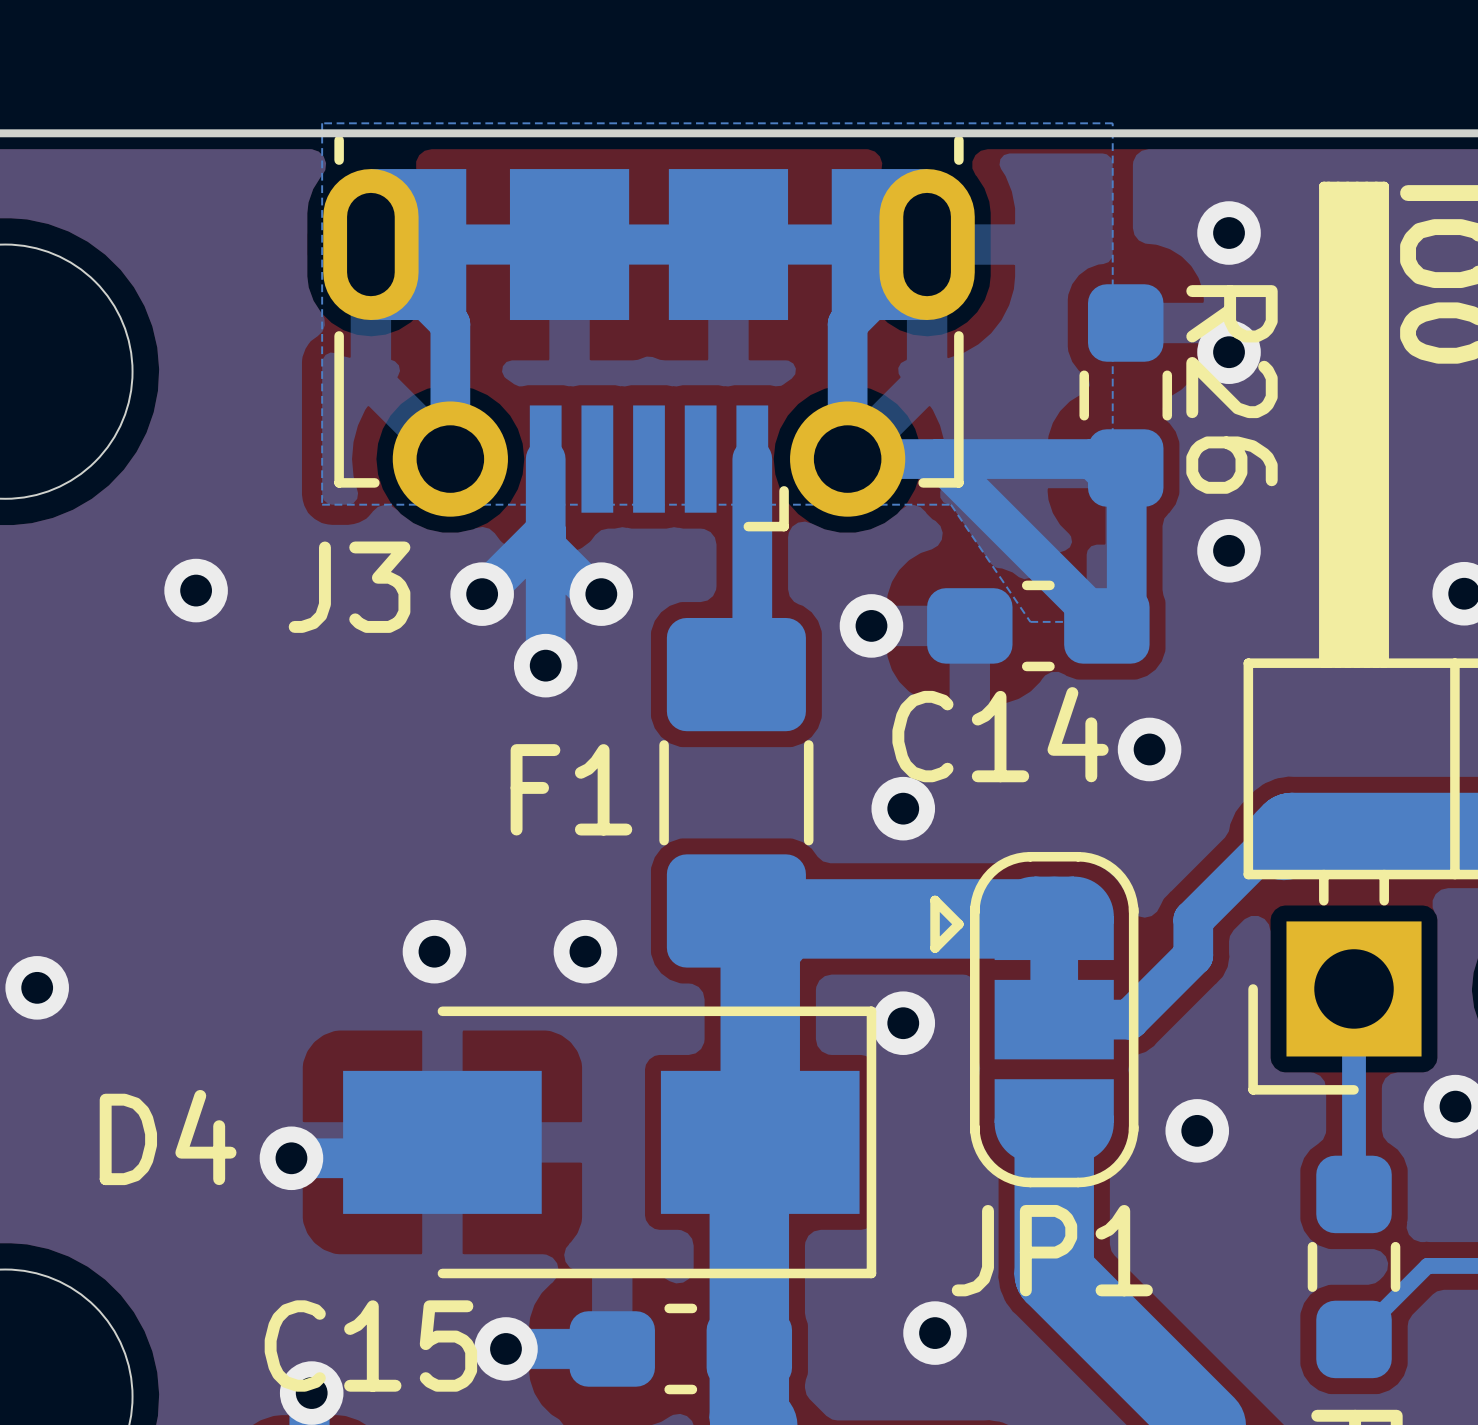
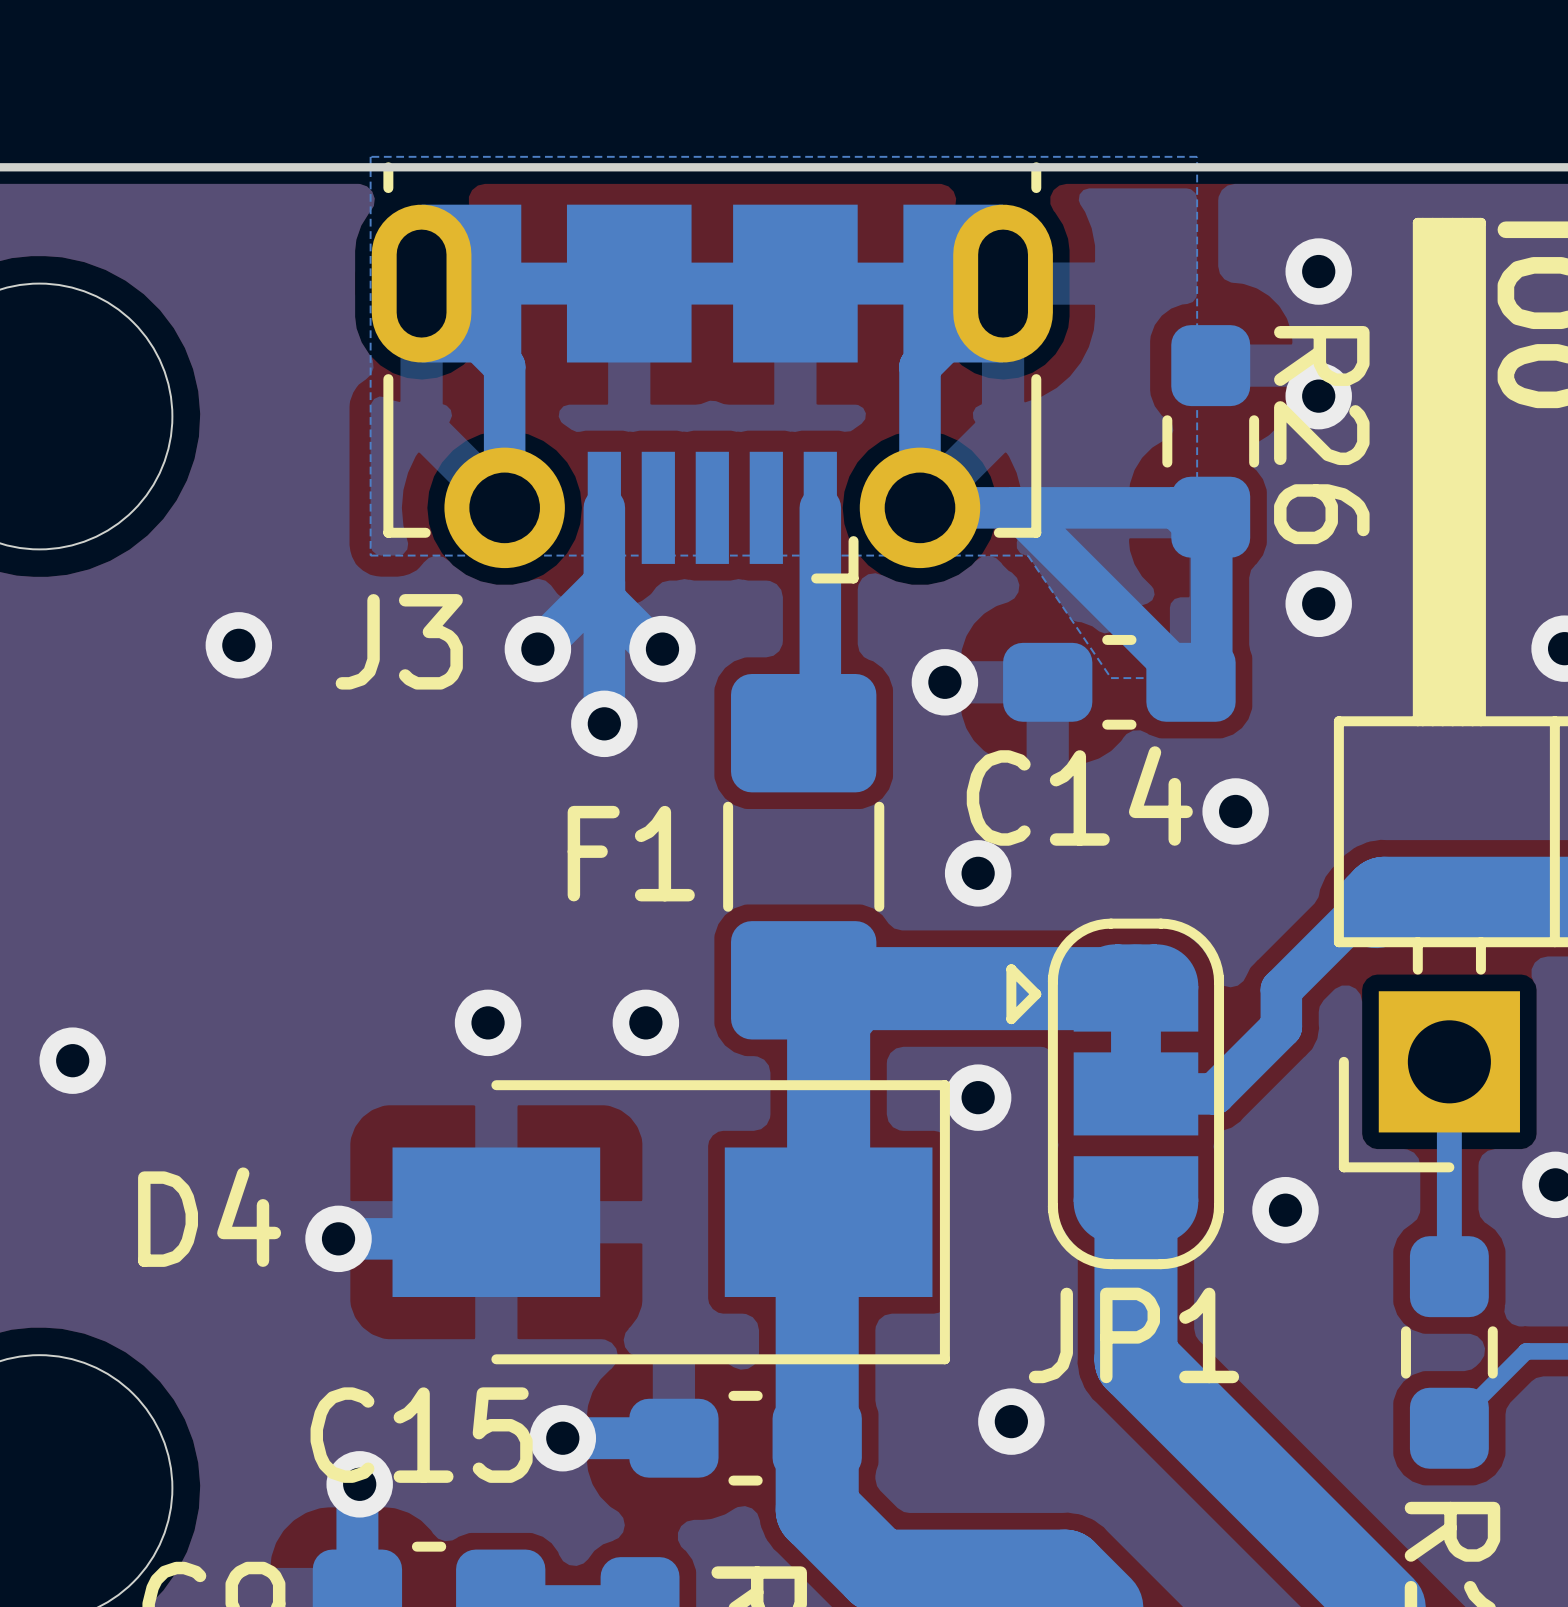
J3 footprint: [323, 135, 975, 532] -> [371, 162, 1053, 584]

